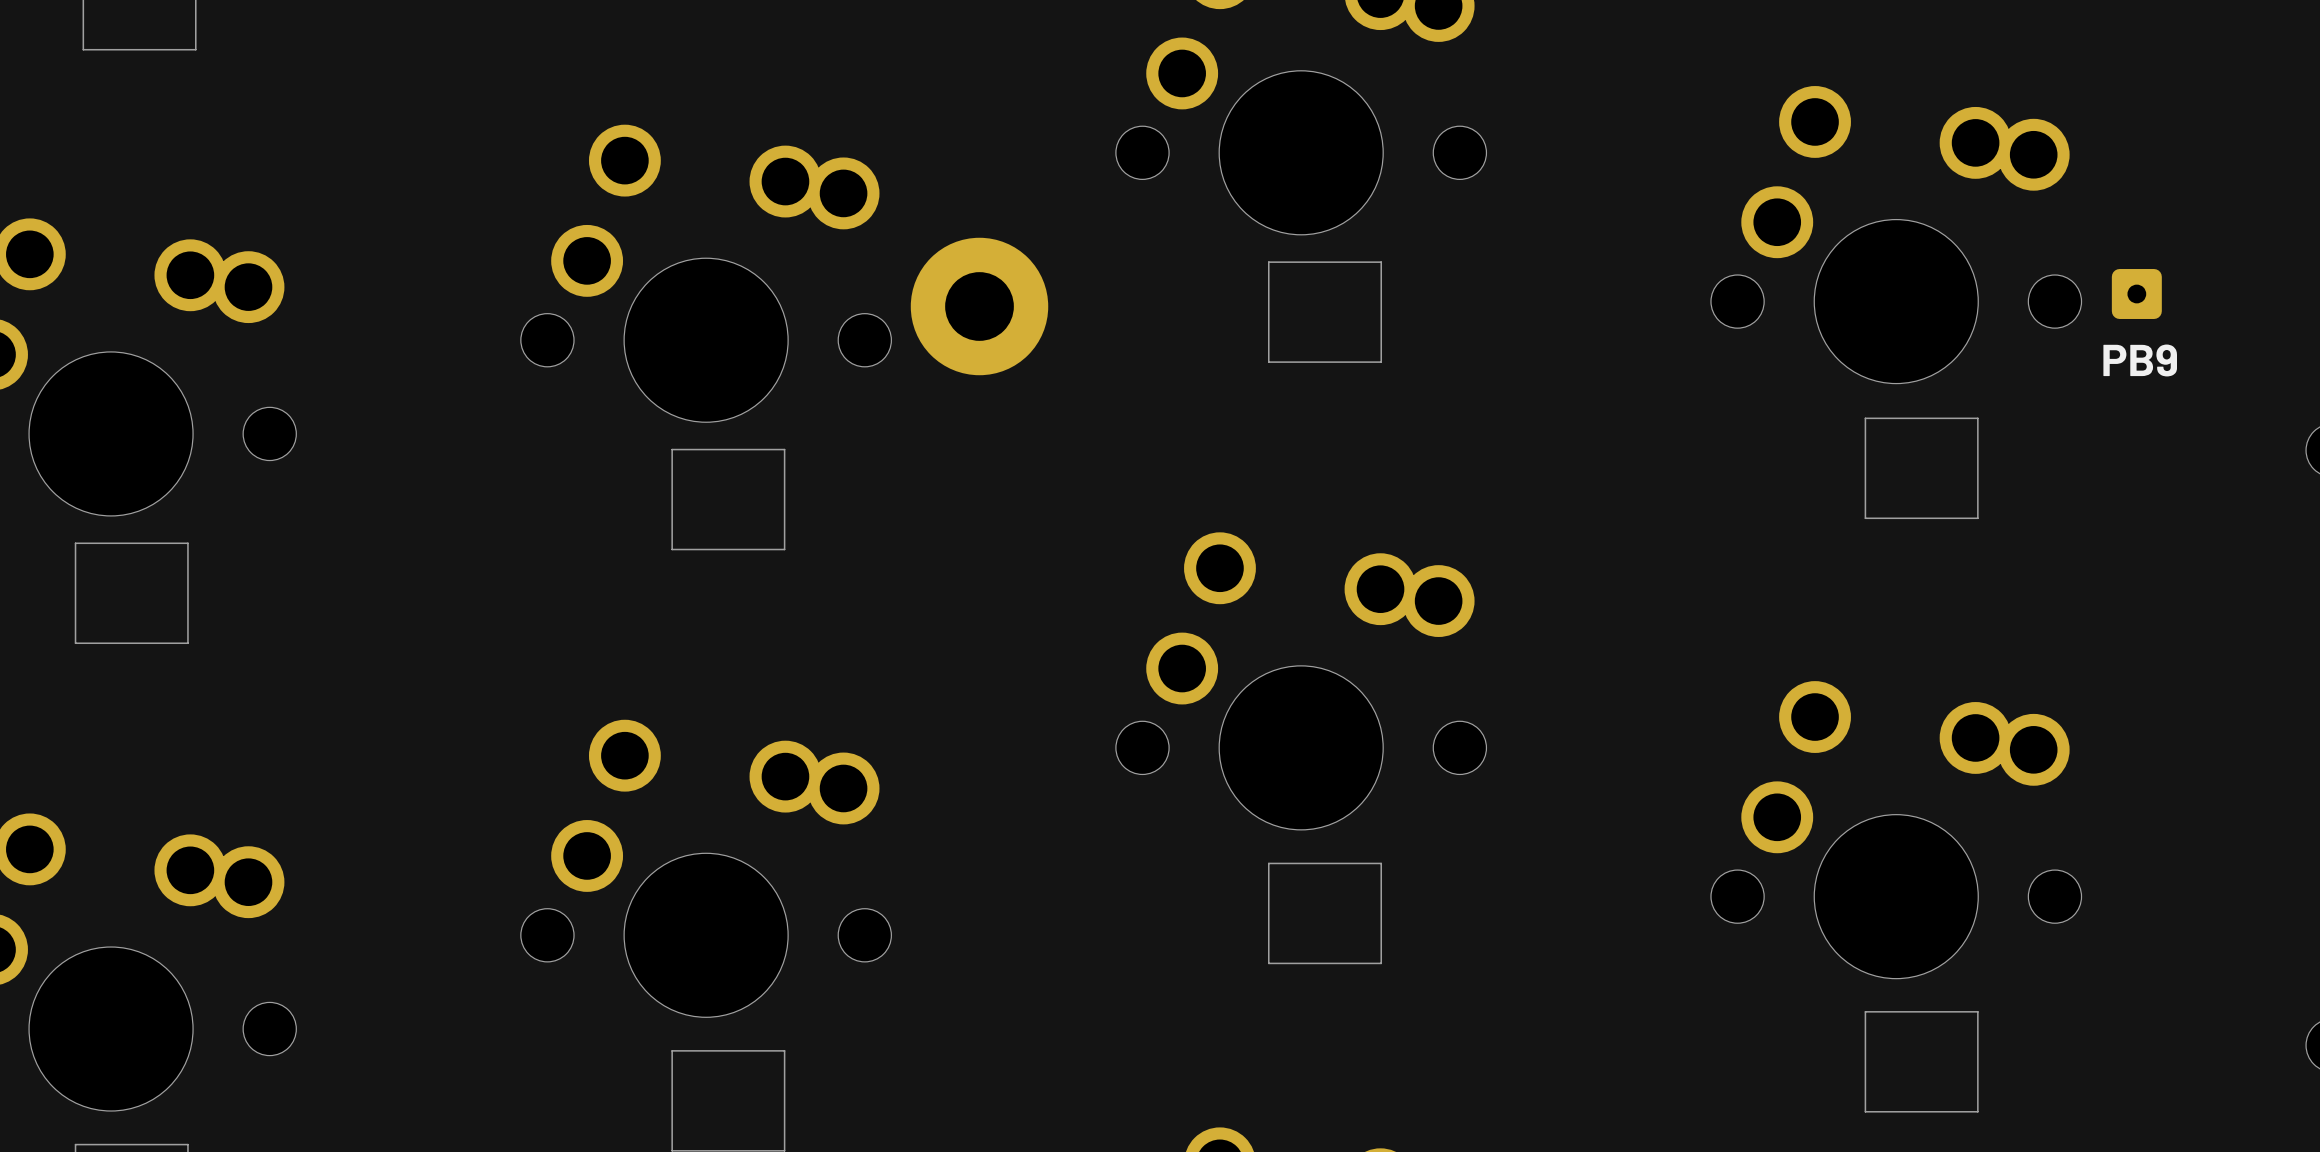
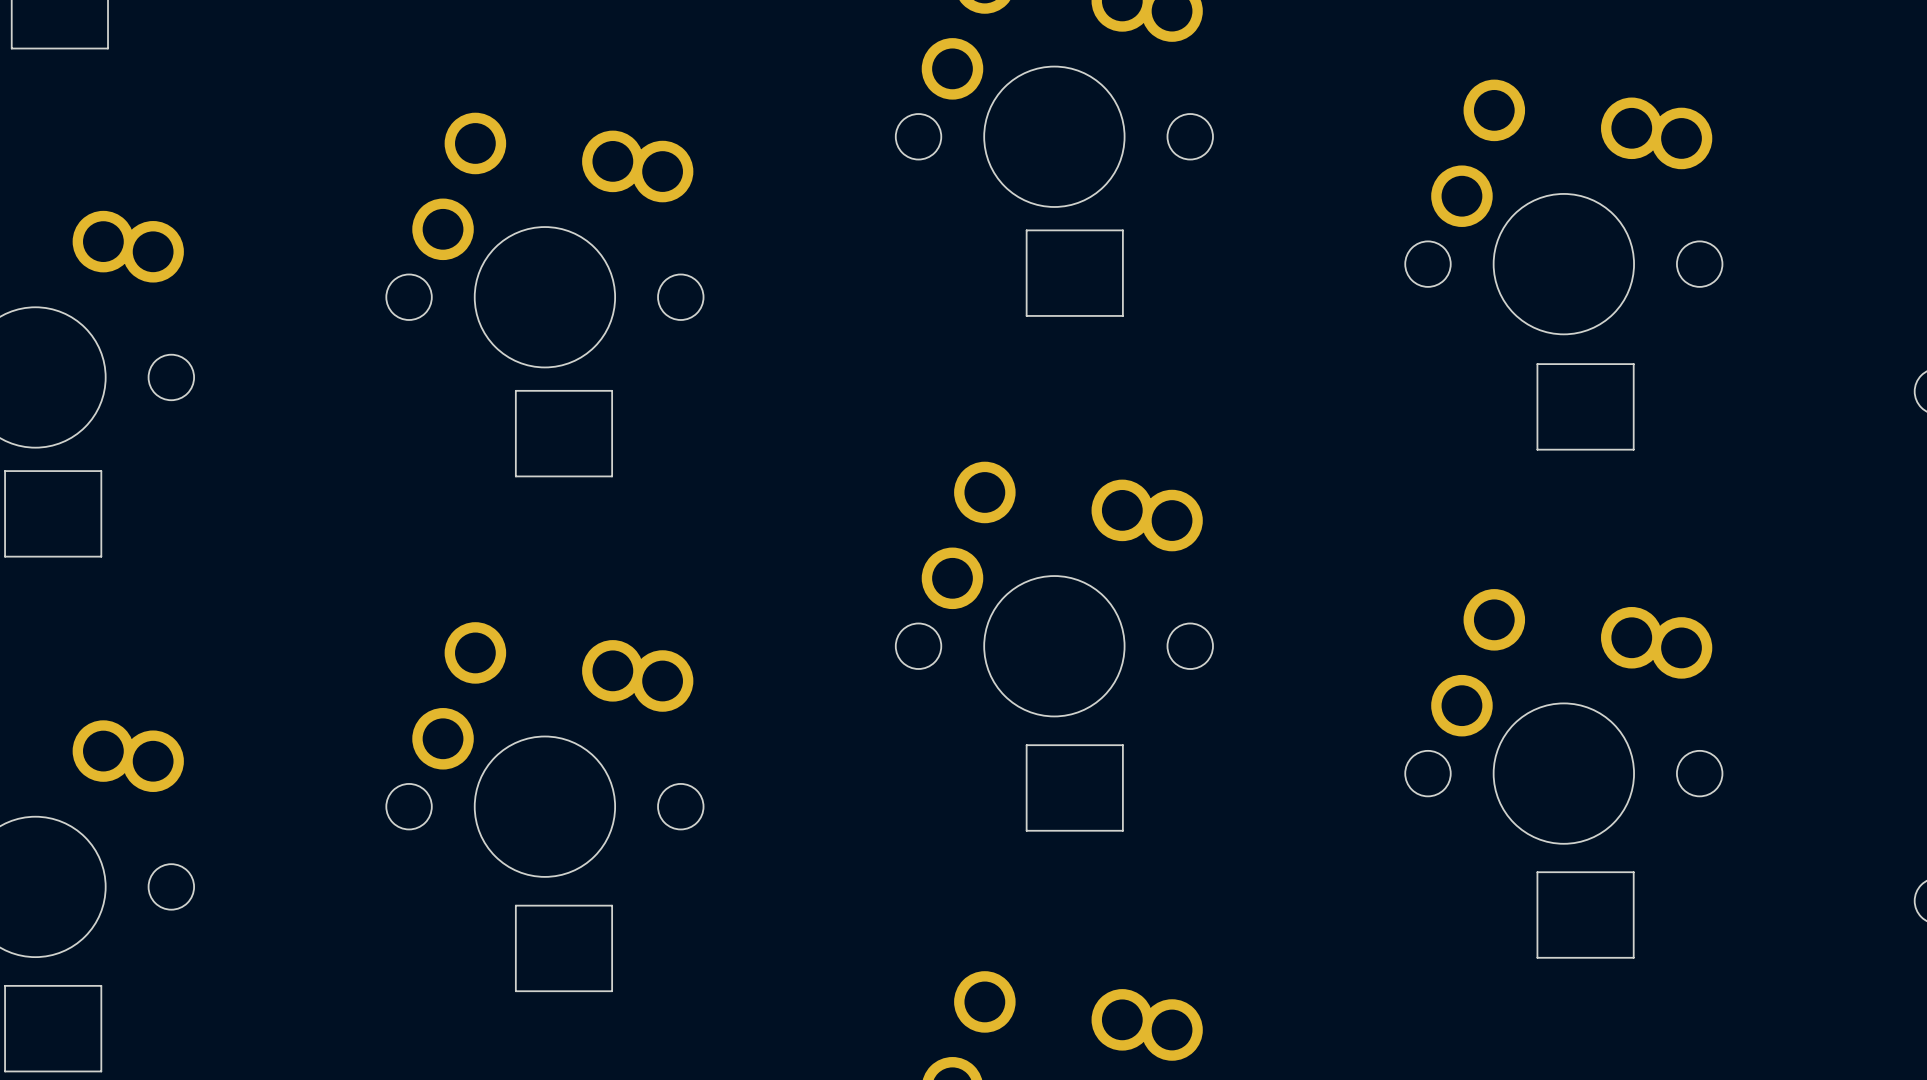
part: (2136, 294) -> none
part: (979, 306) -> none
text: PB9 (2140, 360) -> none

